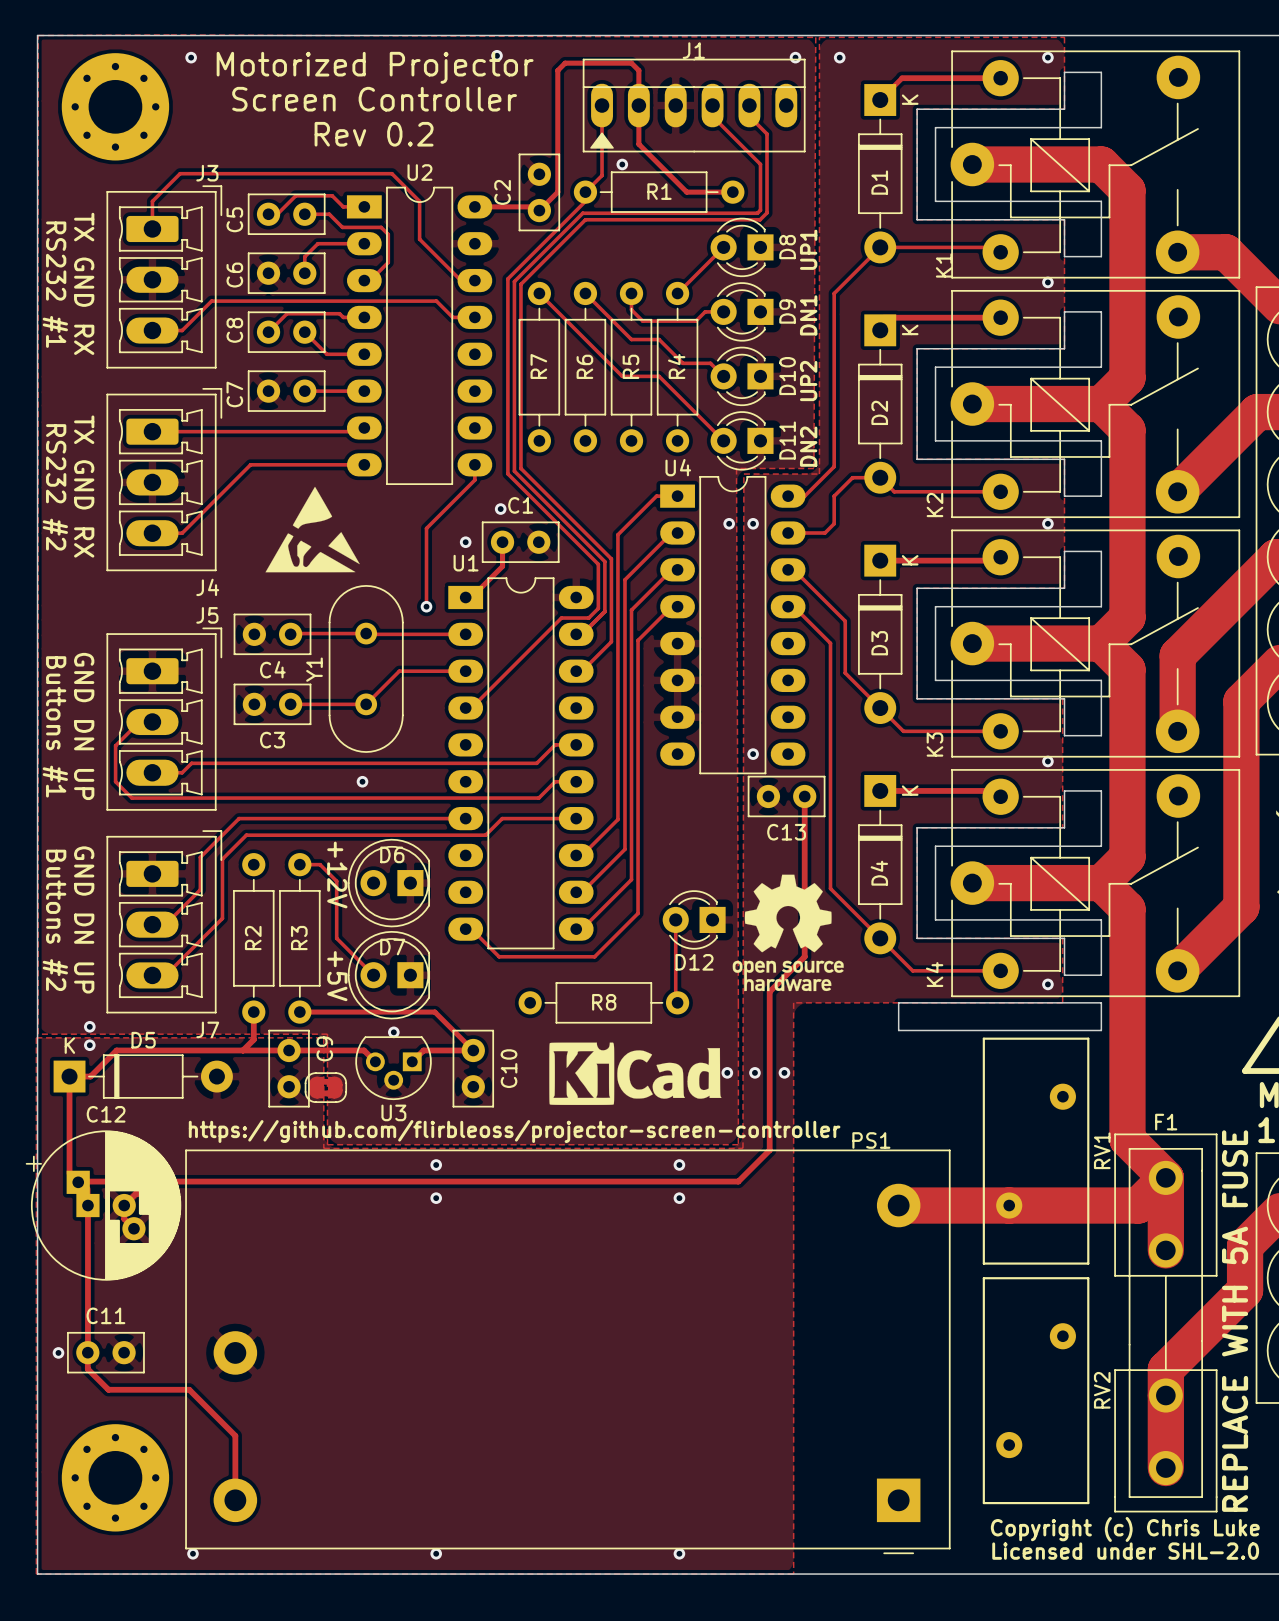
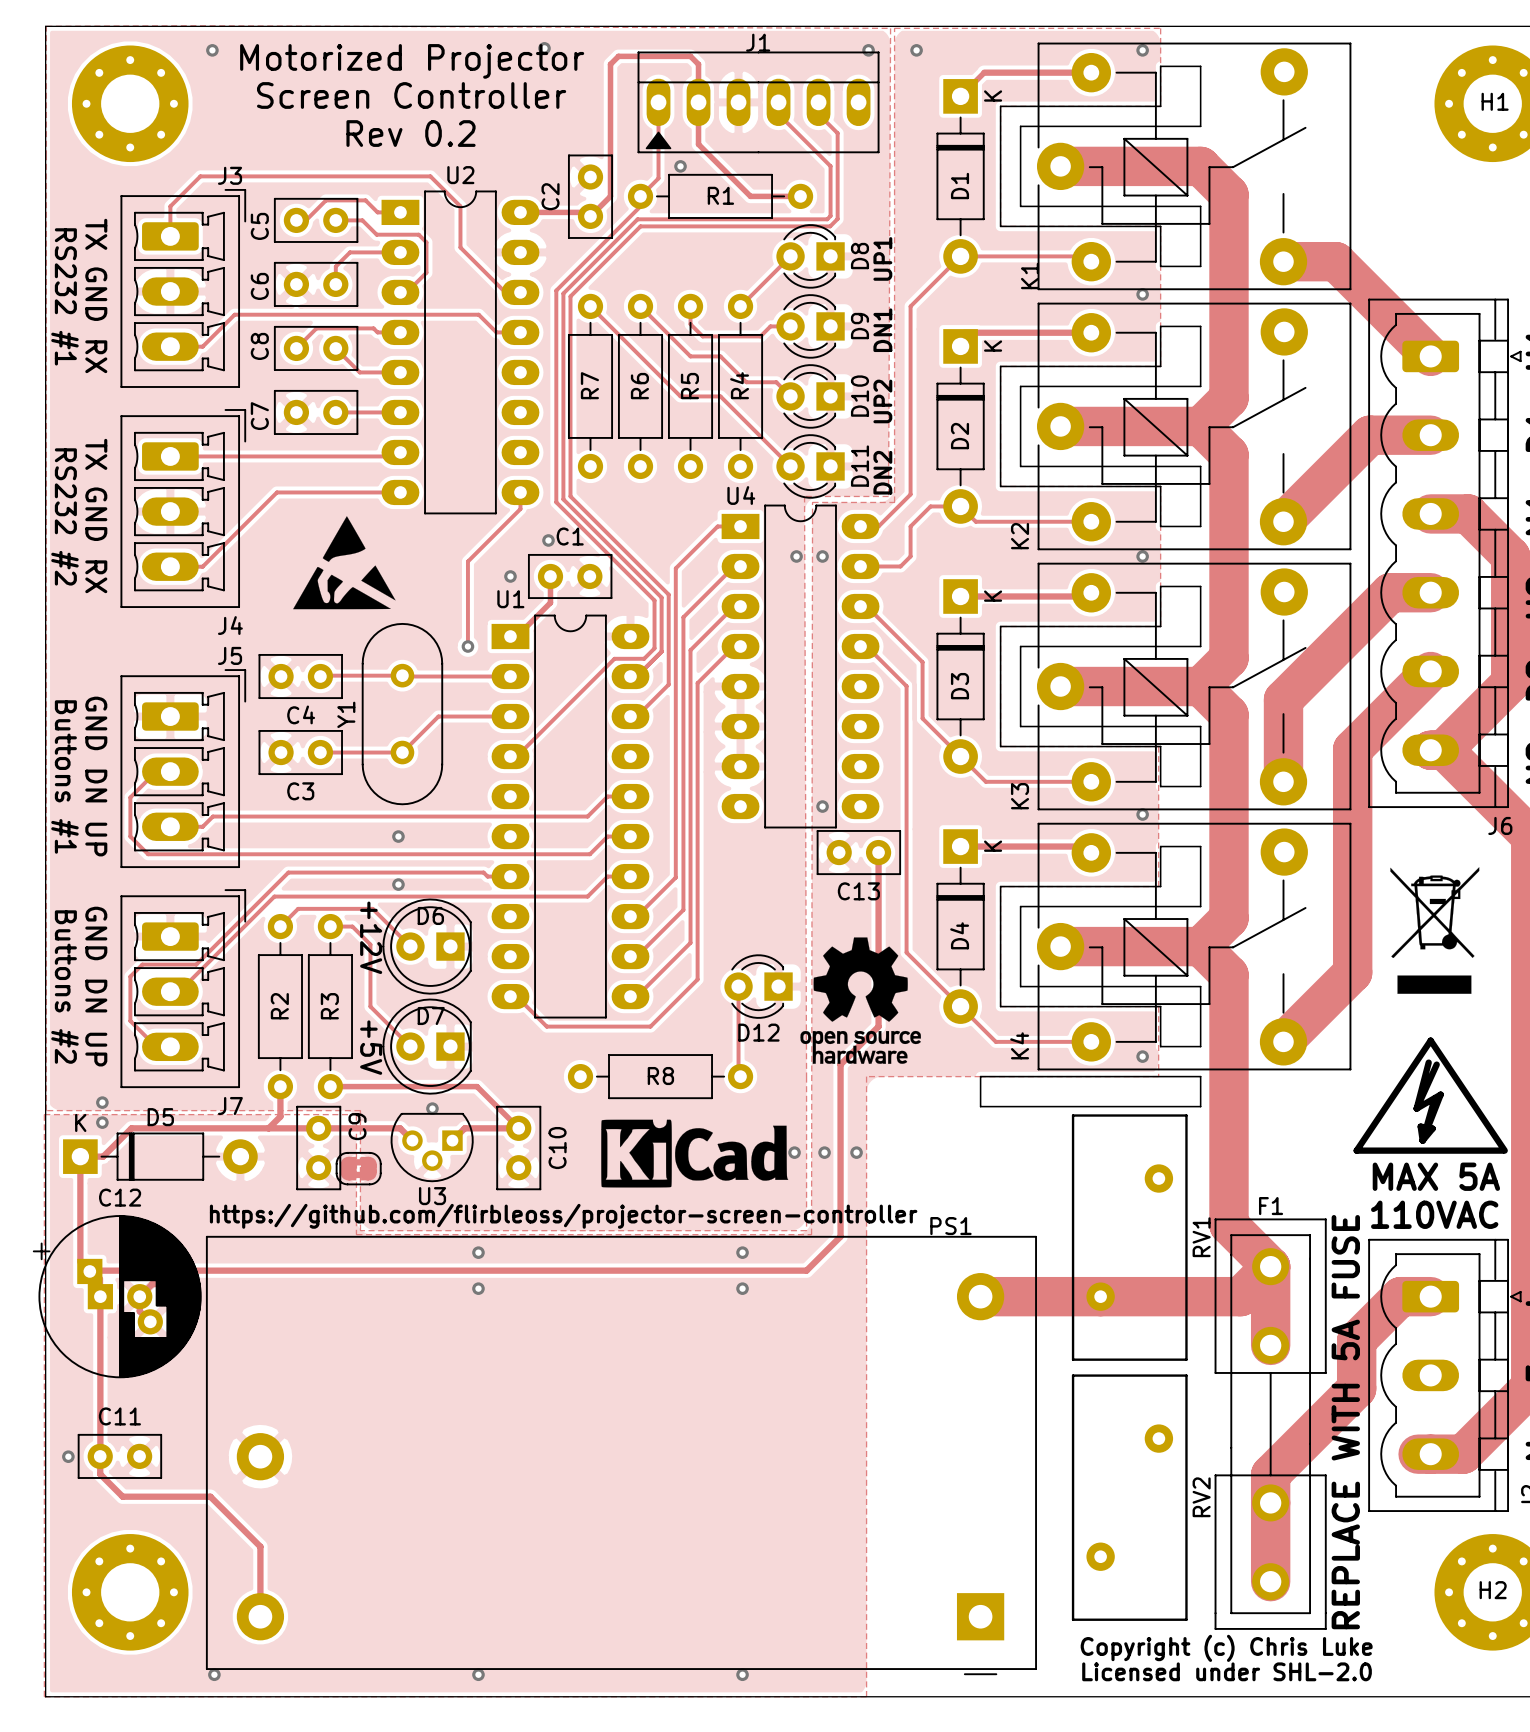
track: (444, 818) (239, 818) (200, 857) (200, 889) (165, 924) (160, 924) -> (487, 876) (483, 872) (288, 872) (196, 964) (142, 964) (130, 976) (130, 1021) (156, 1046) (170, 1046)
track: (555, 818) (502, 818) (485, 835) (246, 835) (222, 859) (222, 918) (165, 975) (152, 975) -> (607, 876) (587, 896) (274, 896) (179, 991)
via: none -> (398, 884)
track: none -> (280, 926) (298, 908) (372, 908) (410, 946)

